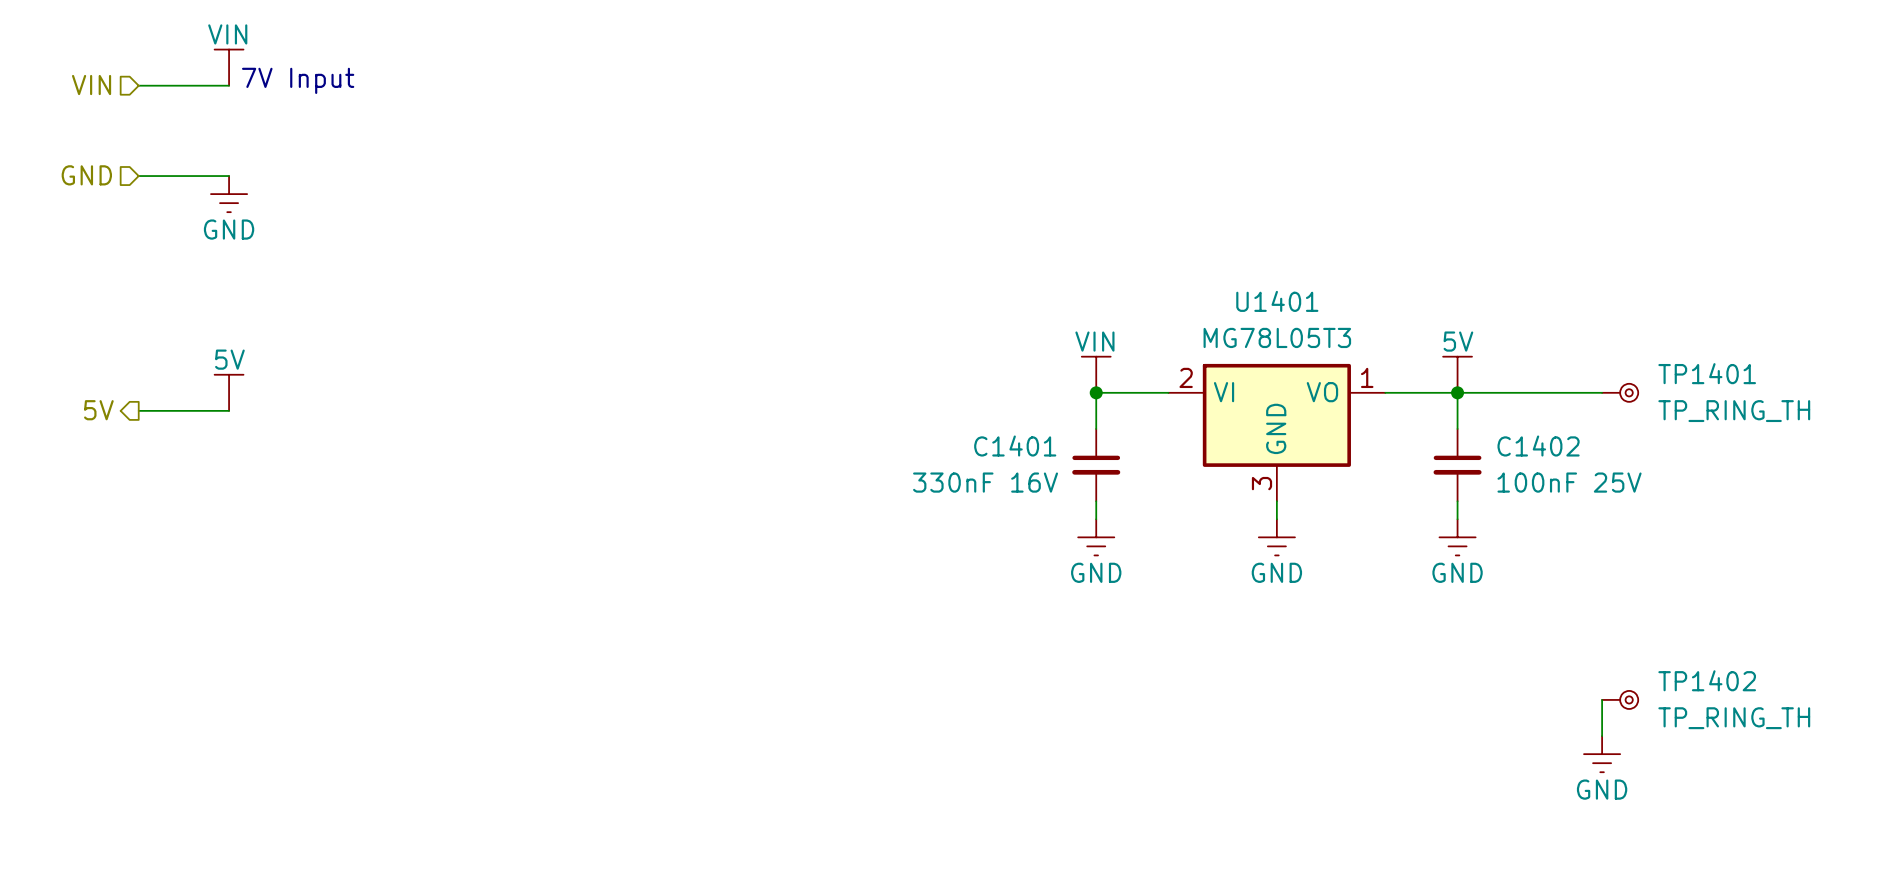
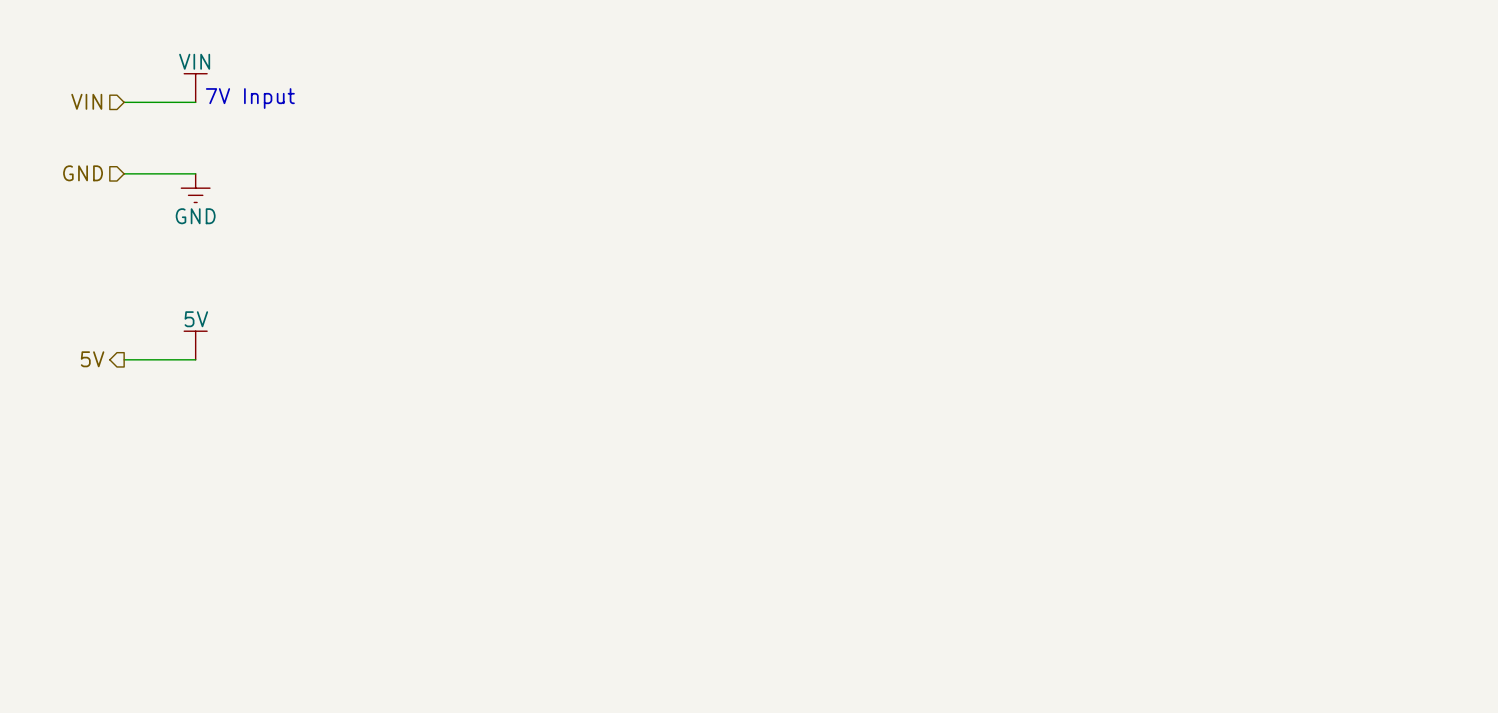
power symbol: VIN (1096, 374) -> none
power symbol: 5V (1457, 374) -> none
junction: (1096, 392) -> none
wire: (1168, 392) (1096, 392) (1096, 428) -> none
wire: (1385, 392) (1602, 392) -> none
wire: (1457, 392) (1457, 428) -> none
junction: (1457, 392) -> none
TP1401: TP_RING_TH (1620, 392) -> none
U1401: MG78L05T3 (1276, 432) -> none
C1401: 330nF 16V (1096, 465) -> none
C1402: 100nF 25V (1457, 465) -> none
wire: (1096, 501) (1096, 519) -> none
wire: (1276, 501) (1276, 519) -> none
wire: (1457, 501) (1457, 519) -> none
power symbol: GND (1096, 537) -> none
power symbol: GND (1276, 537) -> none
power symbol: GND (1457, 537) -> none
wire: (1602, 699) (1602, 736) -> none
TP1402: TP_RING_TH (1620, 699) -> none
power symbol: GND (1602, 754) -> none

